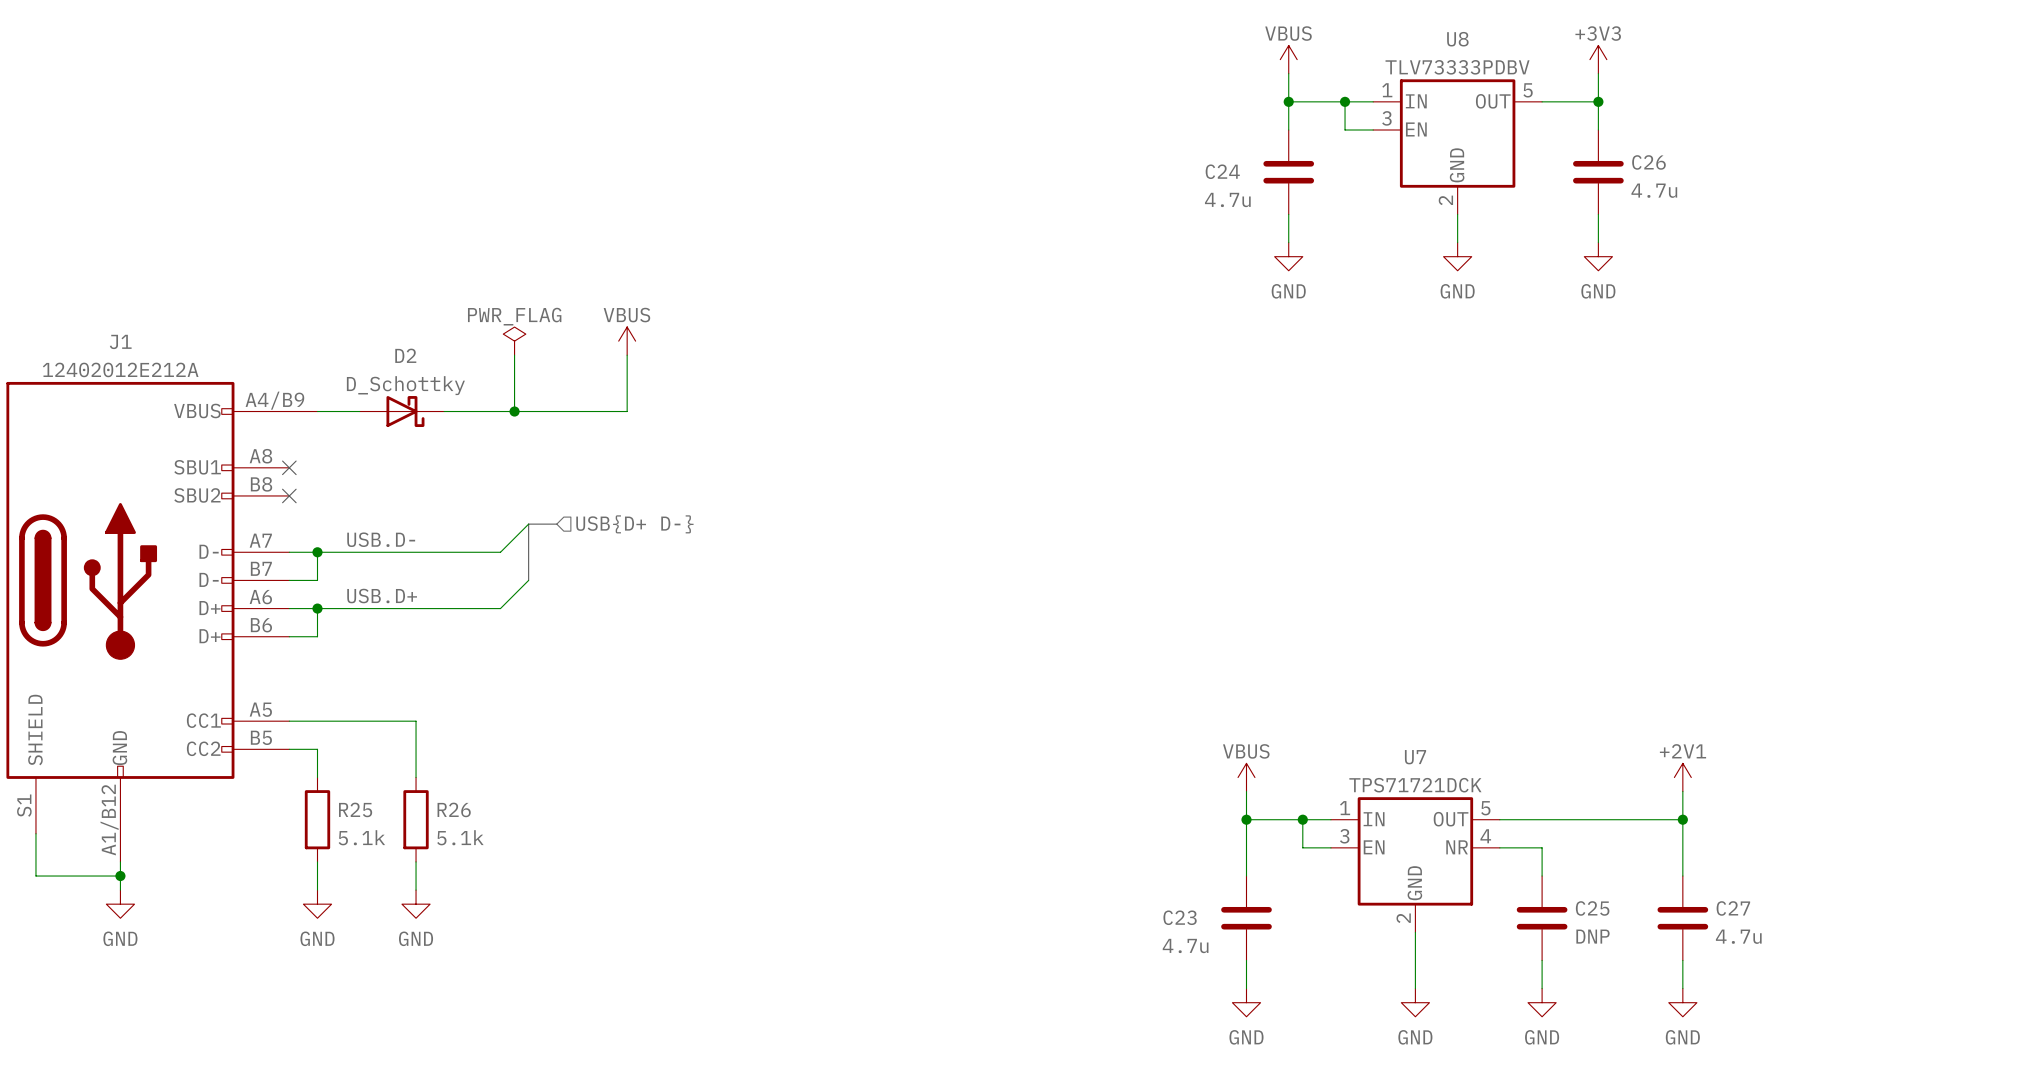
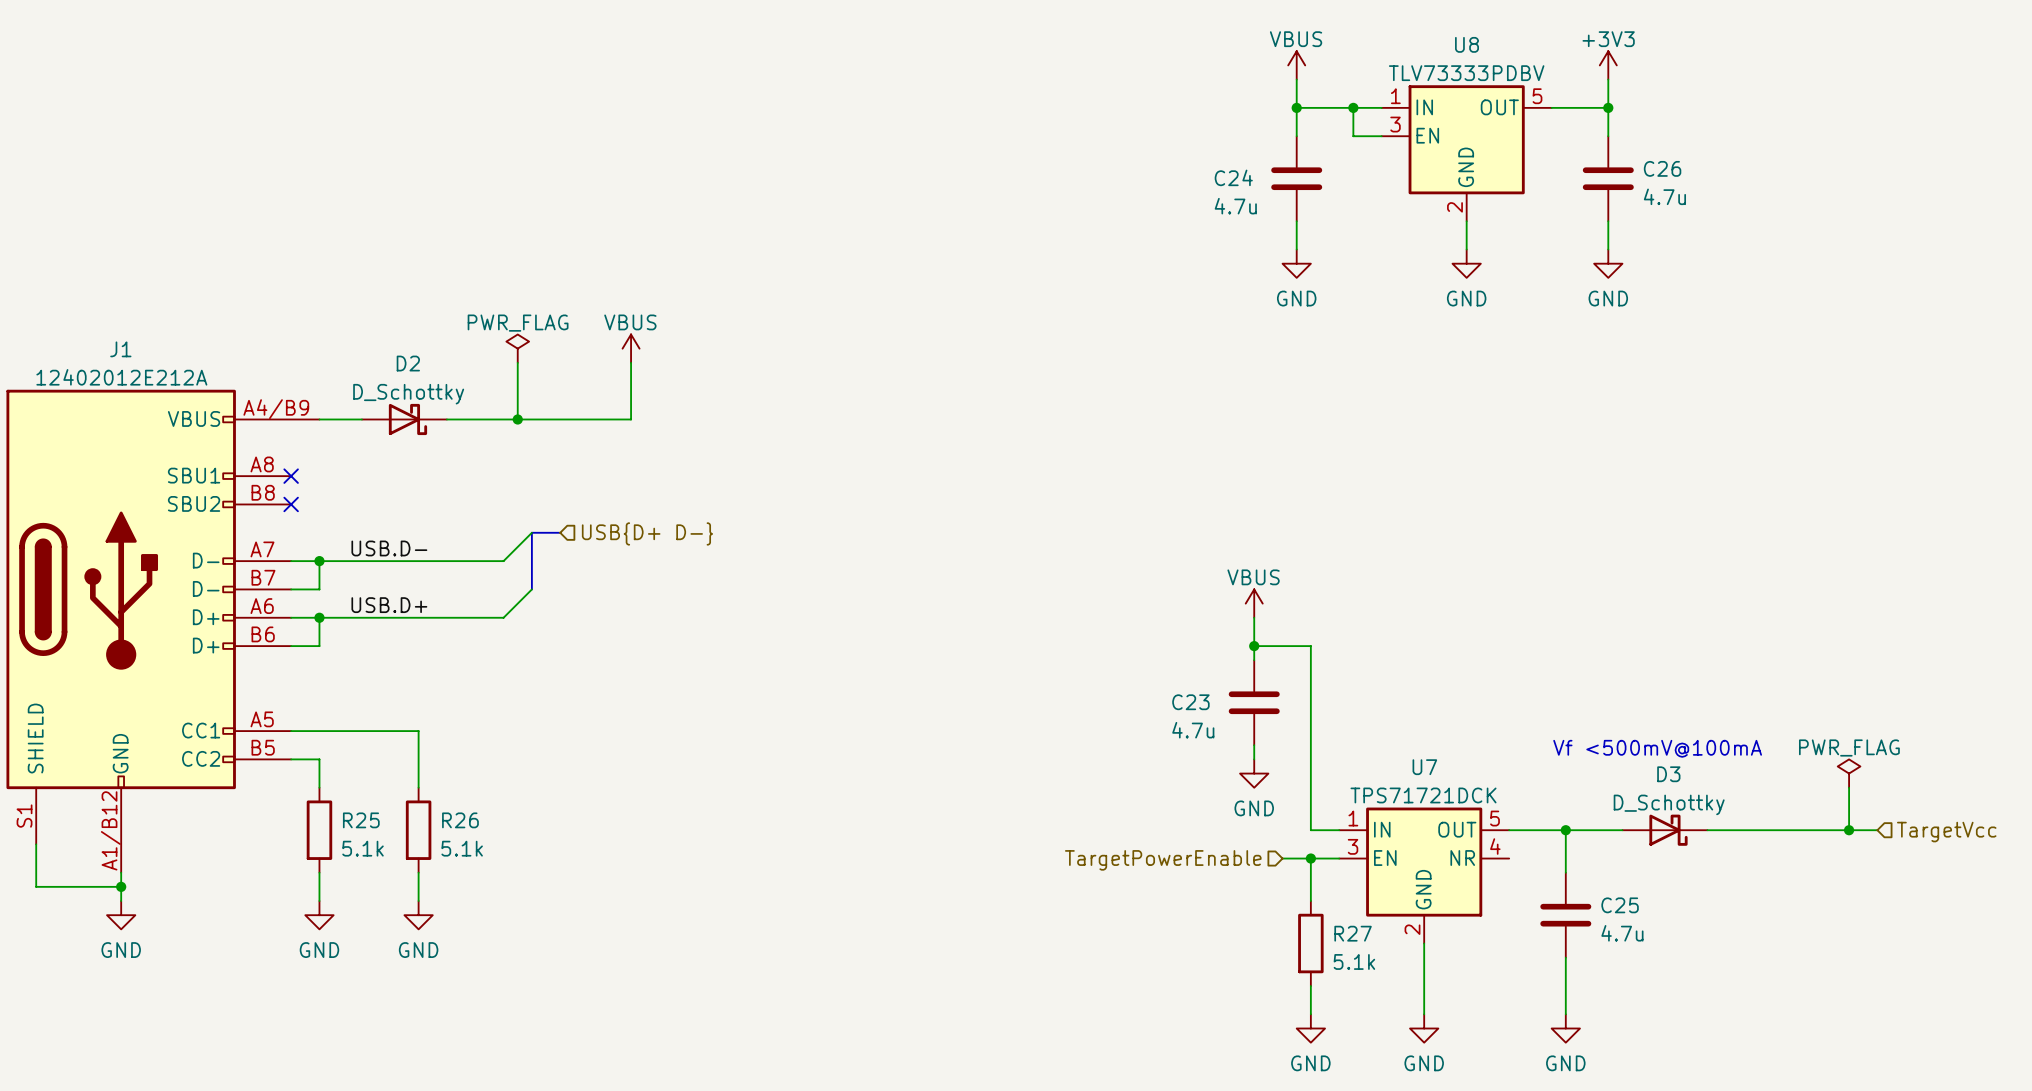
wire: none -> (1254, 617) (1254, 660)
wire: none -> (1254, 646) (1310, 646) (1310, 830)
junction: none -> (1254, 646)
wire: none -> (1254, 745) (1254, 759)
text: none -> Vf <500mV@100mA (1657, 748)
power symbol: none -> GND (1254, 773)
power symbol: none -> PWR_FLAG (1849, 773)
power symbol position: VBUS (1246, 777) -> VBUS (1254, 603)
power symbol: +2V1 (1682, 777) -> none
wire: none -> (1849, 787) (1849, 830)
wire: (1246, 791) (1246, 876) -> none
wire: (1682, 791) (1682, 876) -> none
wire: (1246, 819) (1302, 819) (1302, 847) -> none
junction: (1246, 819) -> none
junction position: (1302, 819) -> (1310, 858)
wire: none -> (1565, 830) (1565, 872)
junction: none -> (1565, 830)
D3: none -> D_Schottky (1664, 830)
junction: (1682, 819) -> none
wire: none -> (1707, 830) (1877, 830)
junction: none -> (1849, 830)
hierarchical label: none -> TargetVcc (1946, 832)
wire: none -> (1282, 858) (1310, 858) (1310, 901)
wire: (1499, 847) (1542, 847) (1542, 876) -> none
hierarchical label: none -> TargetPowerEnable (1163, 860)
C23 position: (1246, 918) -> (1254, 702)
C25 position: (1542, 918) -> (1565, 915)
C27: 4.7u (1682, 918) -> none
R27: none -> 5.1k (1310, 943)
C25 value: DNP (1592, 936) -> 4.7u (1622, 933)
wire: none -> (1565, 957) (1565, 1014)
wire: (1246, 960) (1246, 988) -> (1310, 986) (1310, 1014)
wire: (1542, 960) (1542, 988) -> none
wire: (1682, 960) (1682, 988) -> none
power symbol: GND (1246, 1002) -> none
power symbol position: GND (1415, 1002) -> GND (1424, 1028)
power symbol position: GND (1542, 1002) -> GND (1565, 1028)
power symbol: GND (1682, 1002) -> none
power symbol: none -> GND (1310, 1028)

